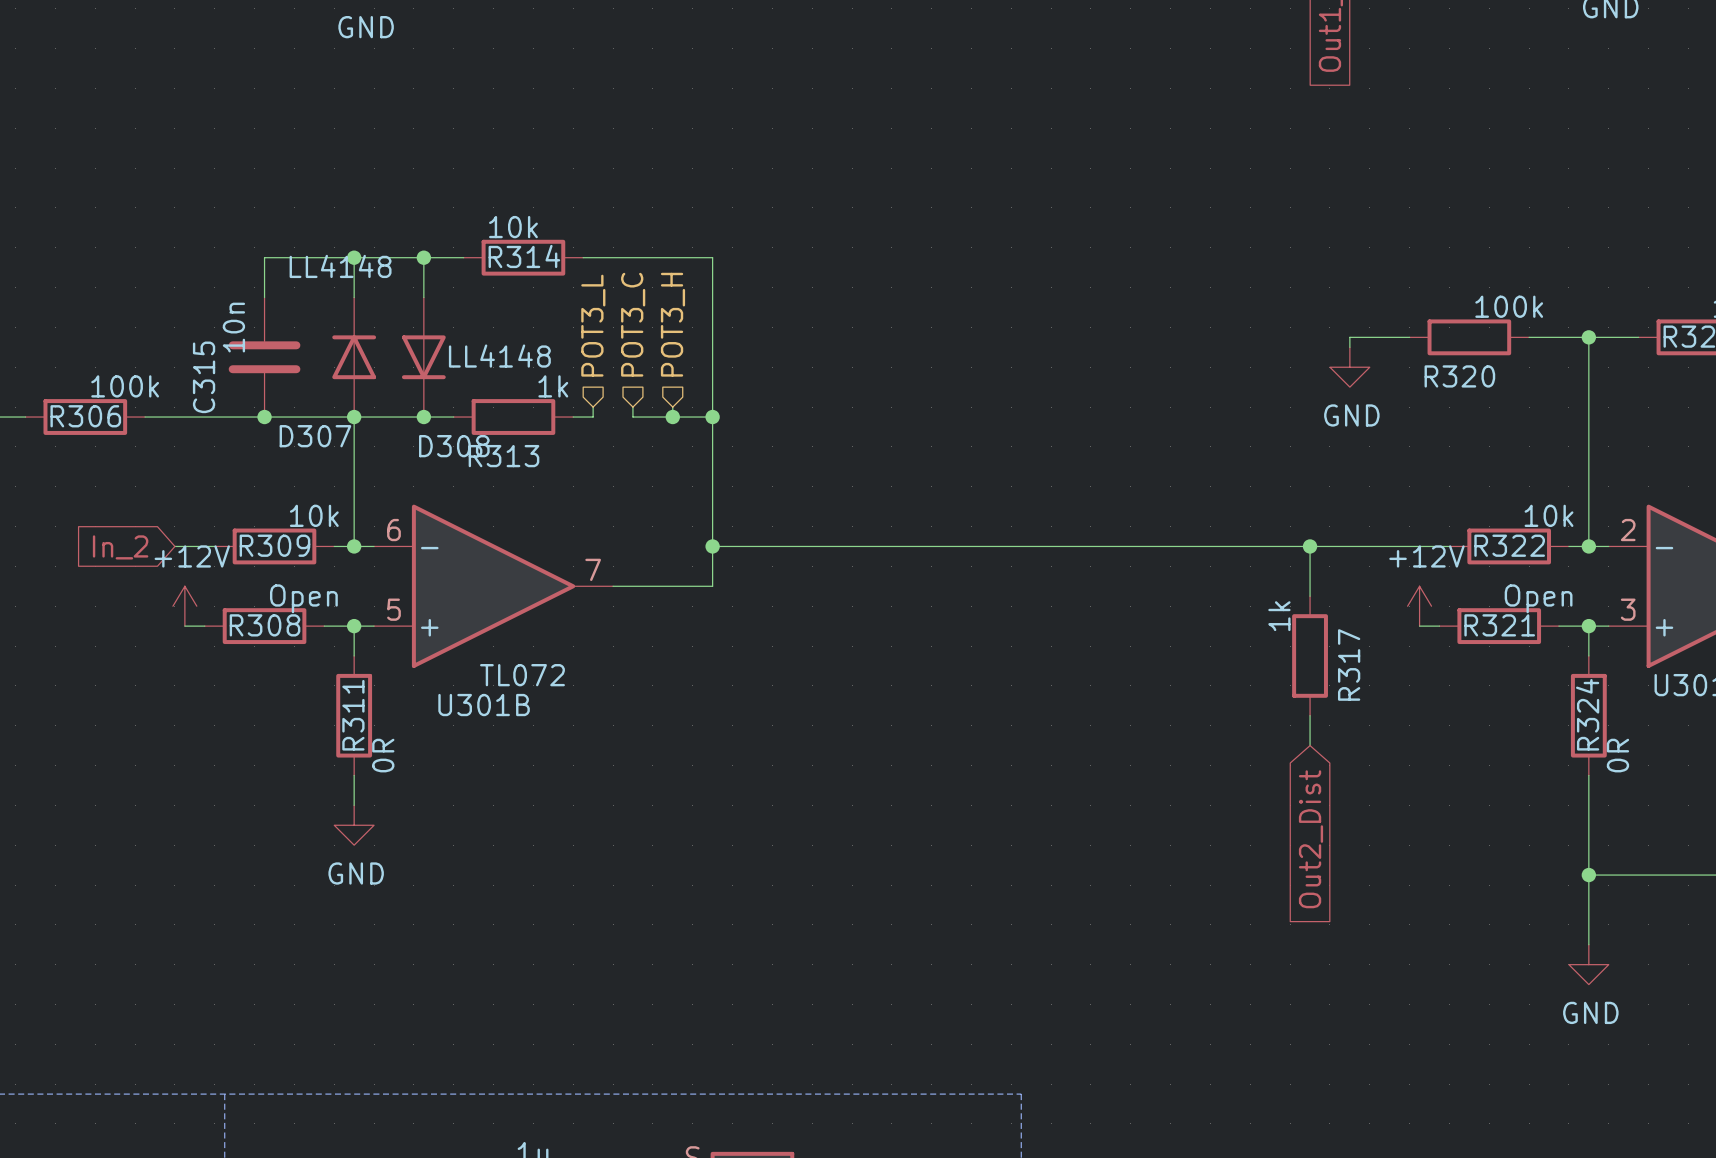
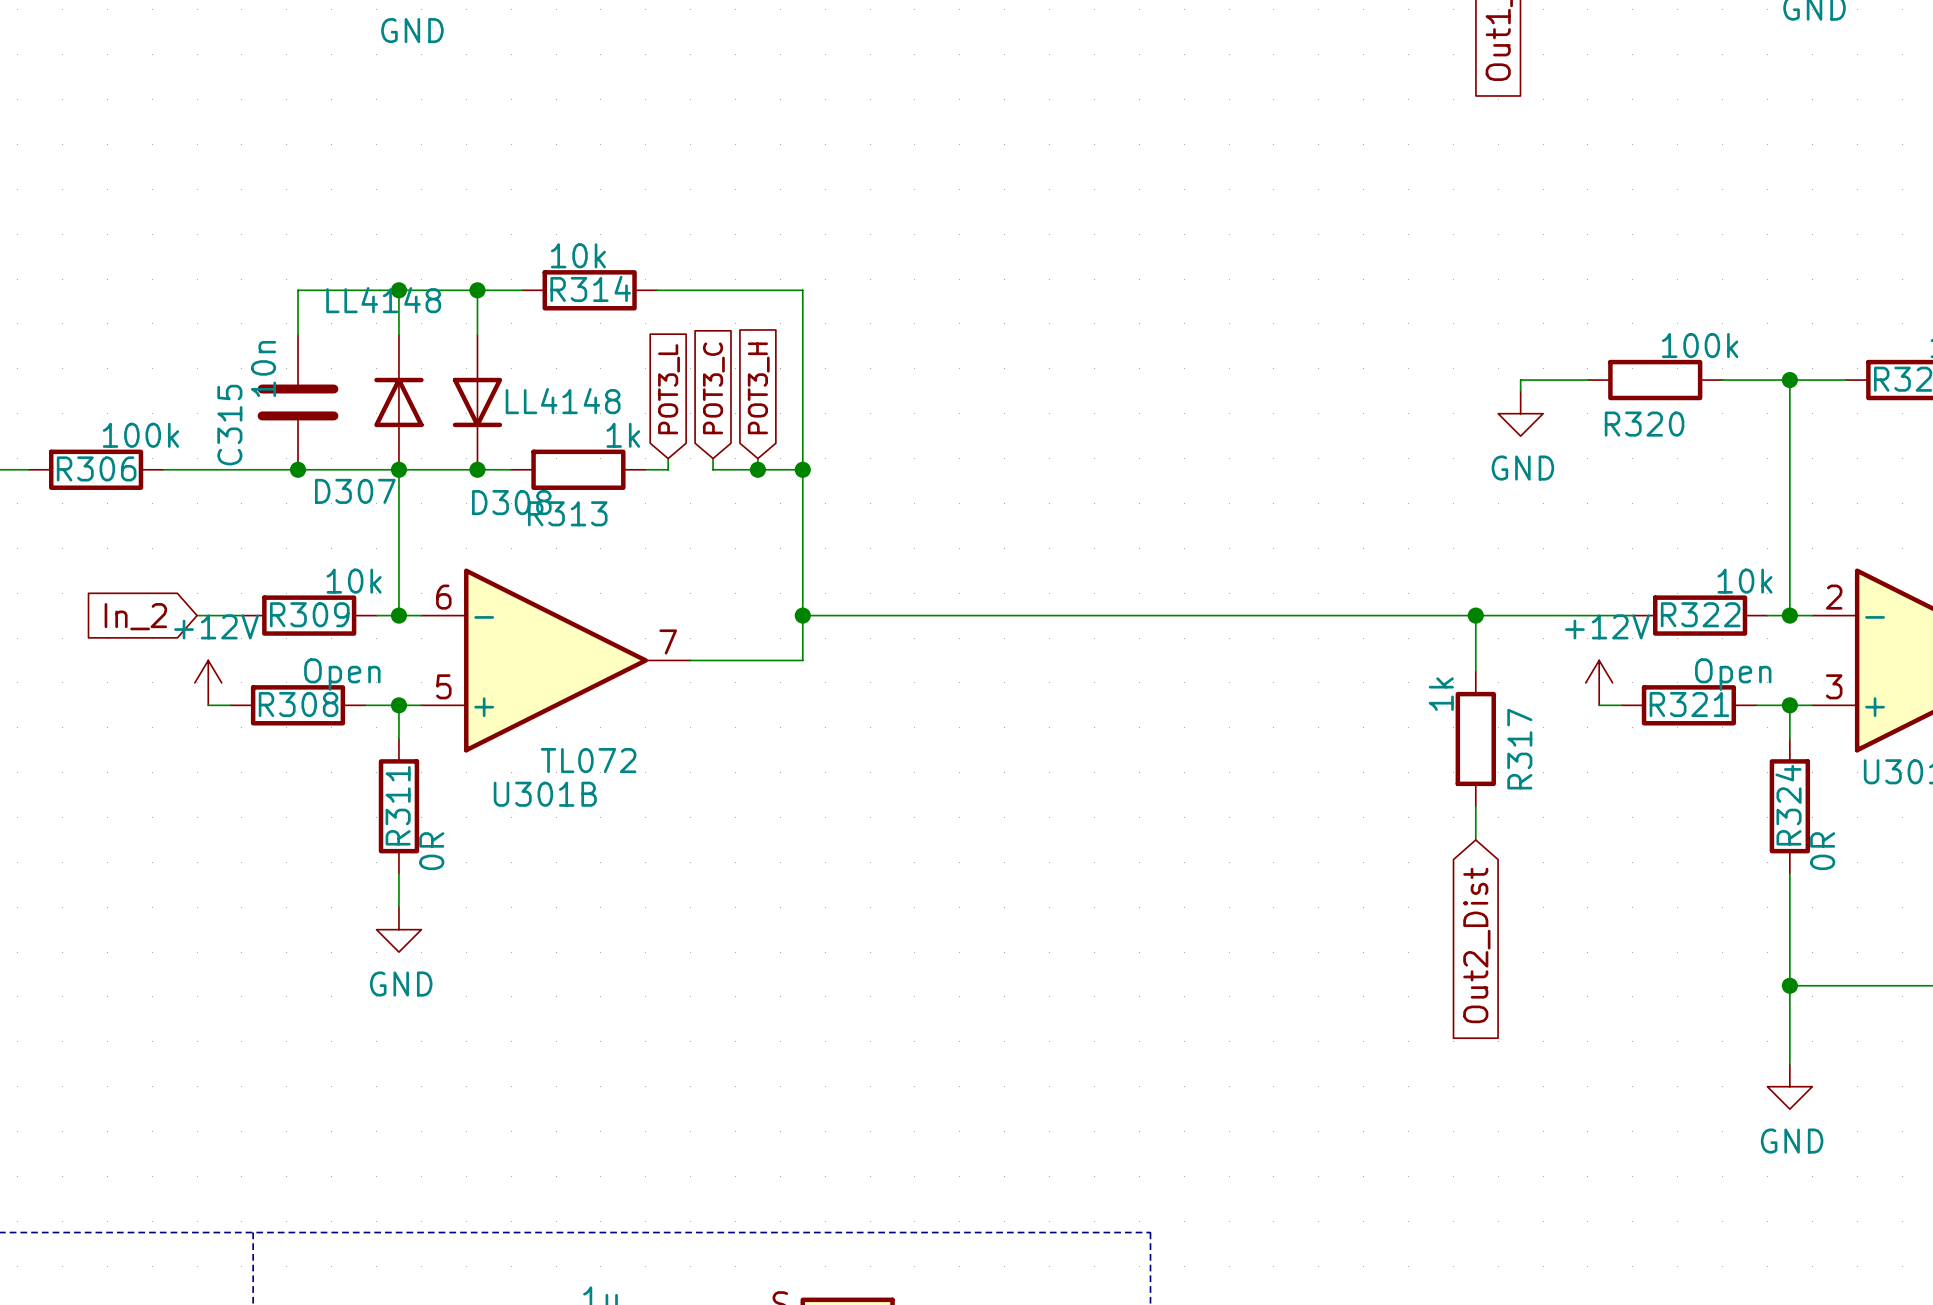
hierarchical label: POT3_C (633, 324) -> none
hierarchical label: POT3_H (672, 324) -> none
hierarchical label: POT3_L (593, 325) -> none
global label: none -> POT3_C (713, 388)
global label: none -> POT3_H (758, 388)
global label: none -> POT3_L (669, 389)

